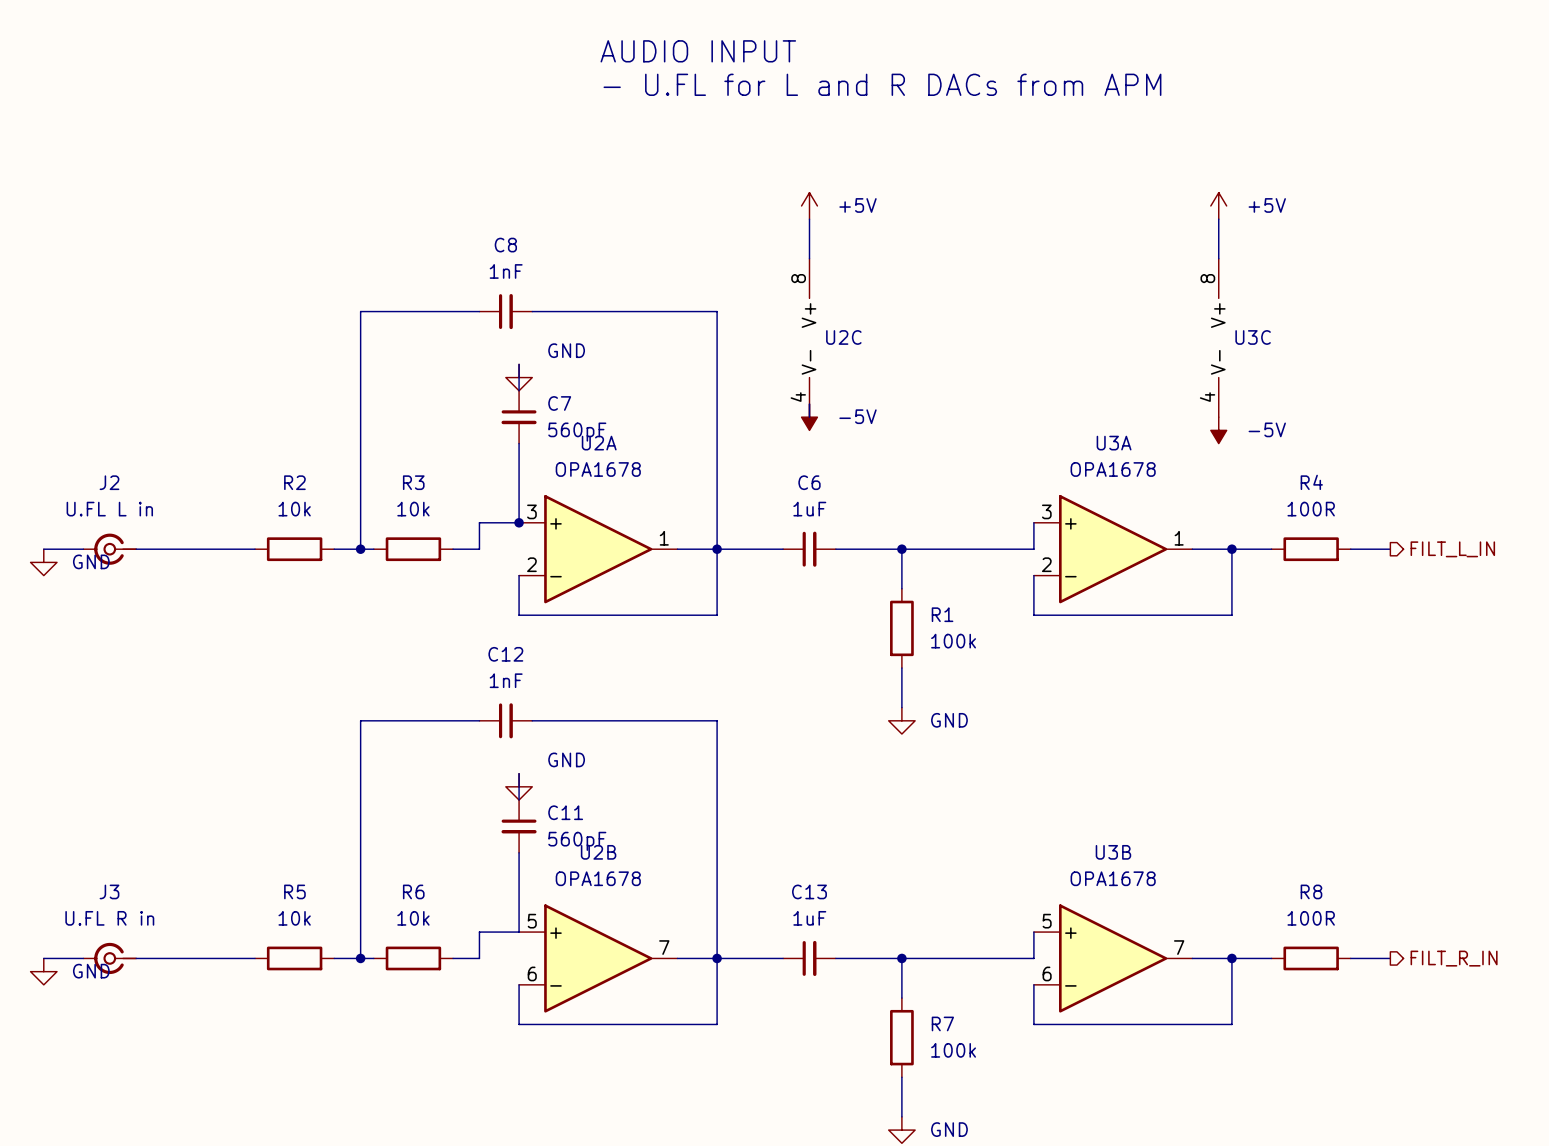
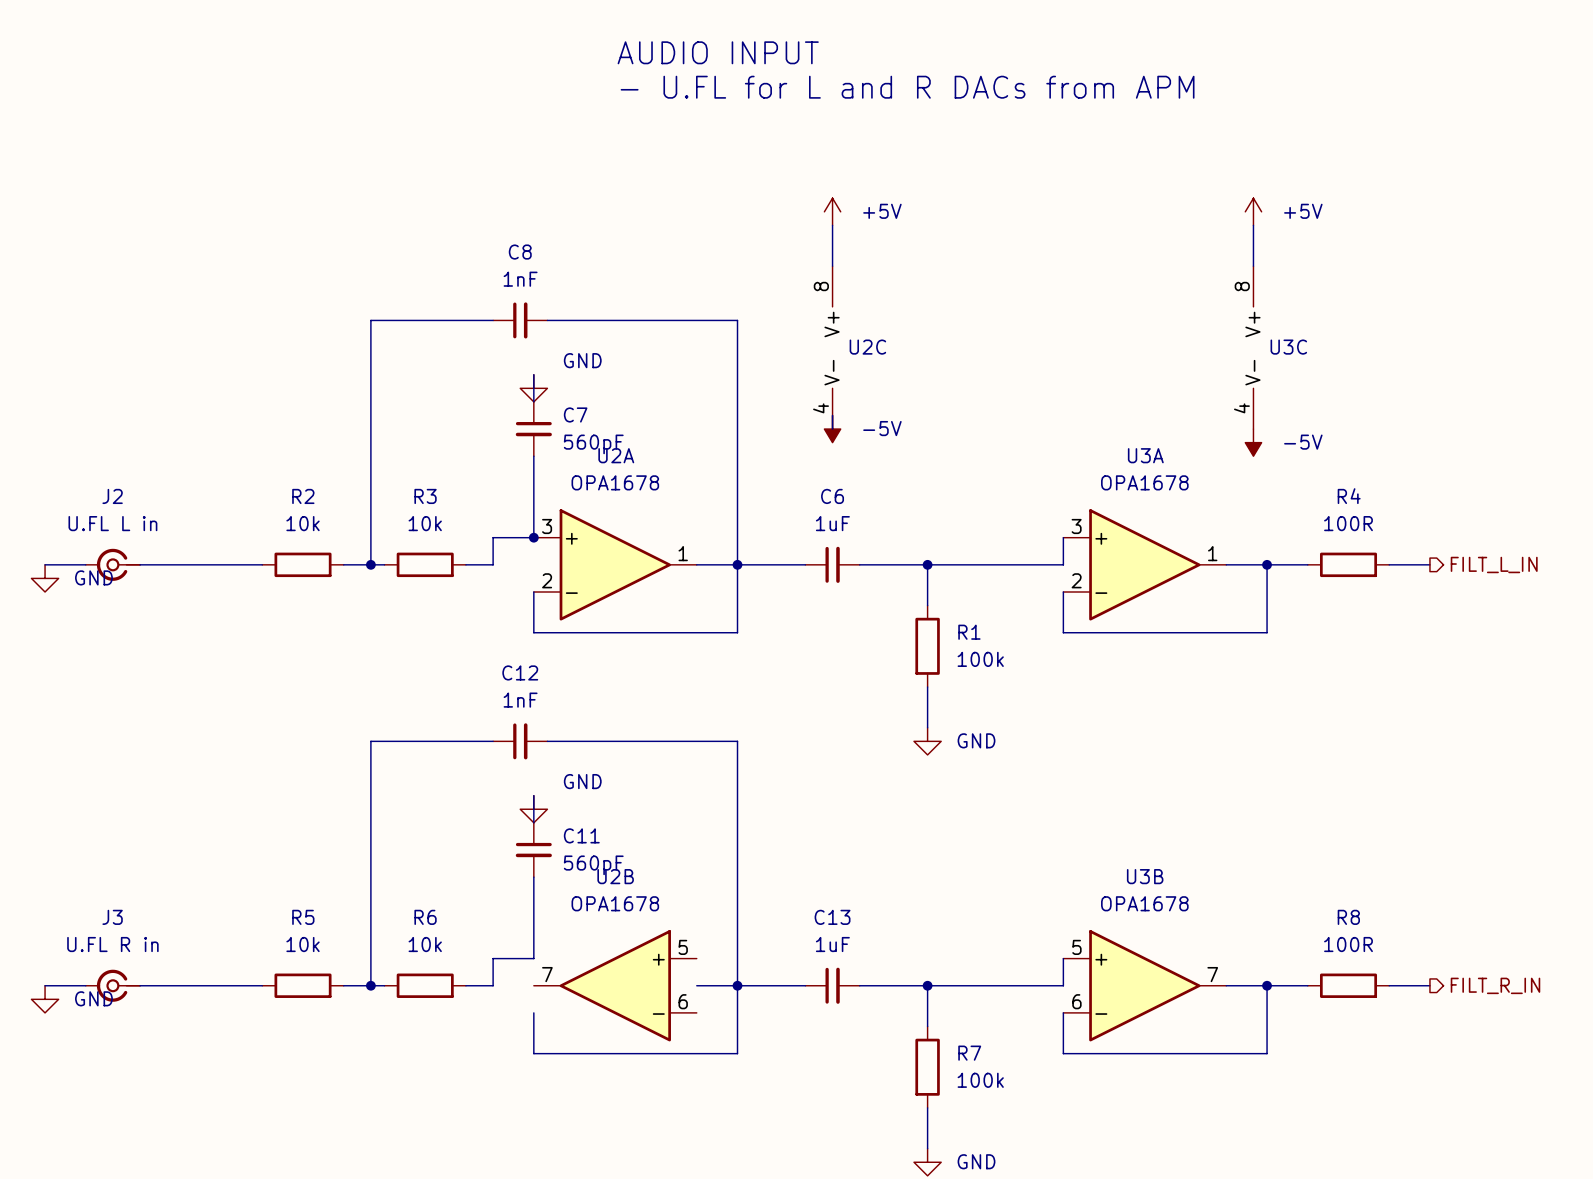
U2B flip: as is (598, 958) -> left-right (615, 985)

